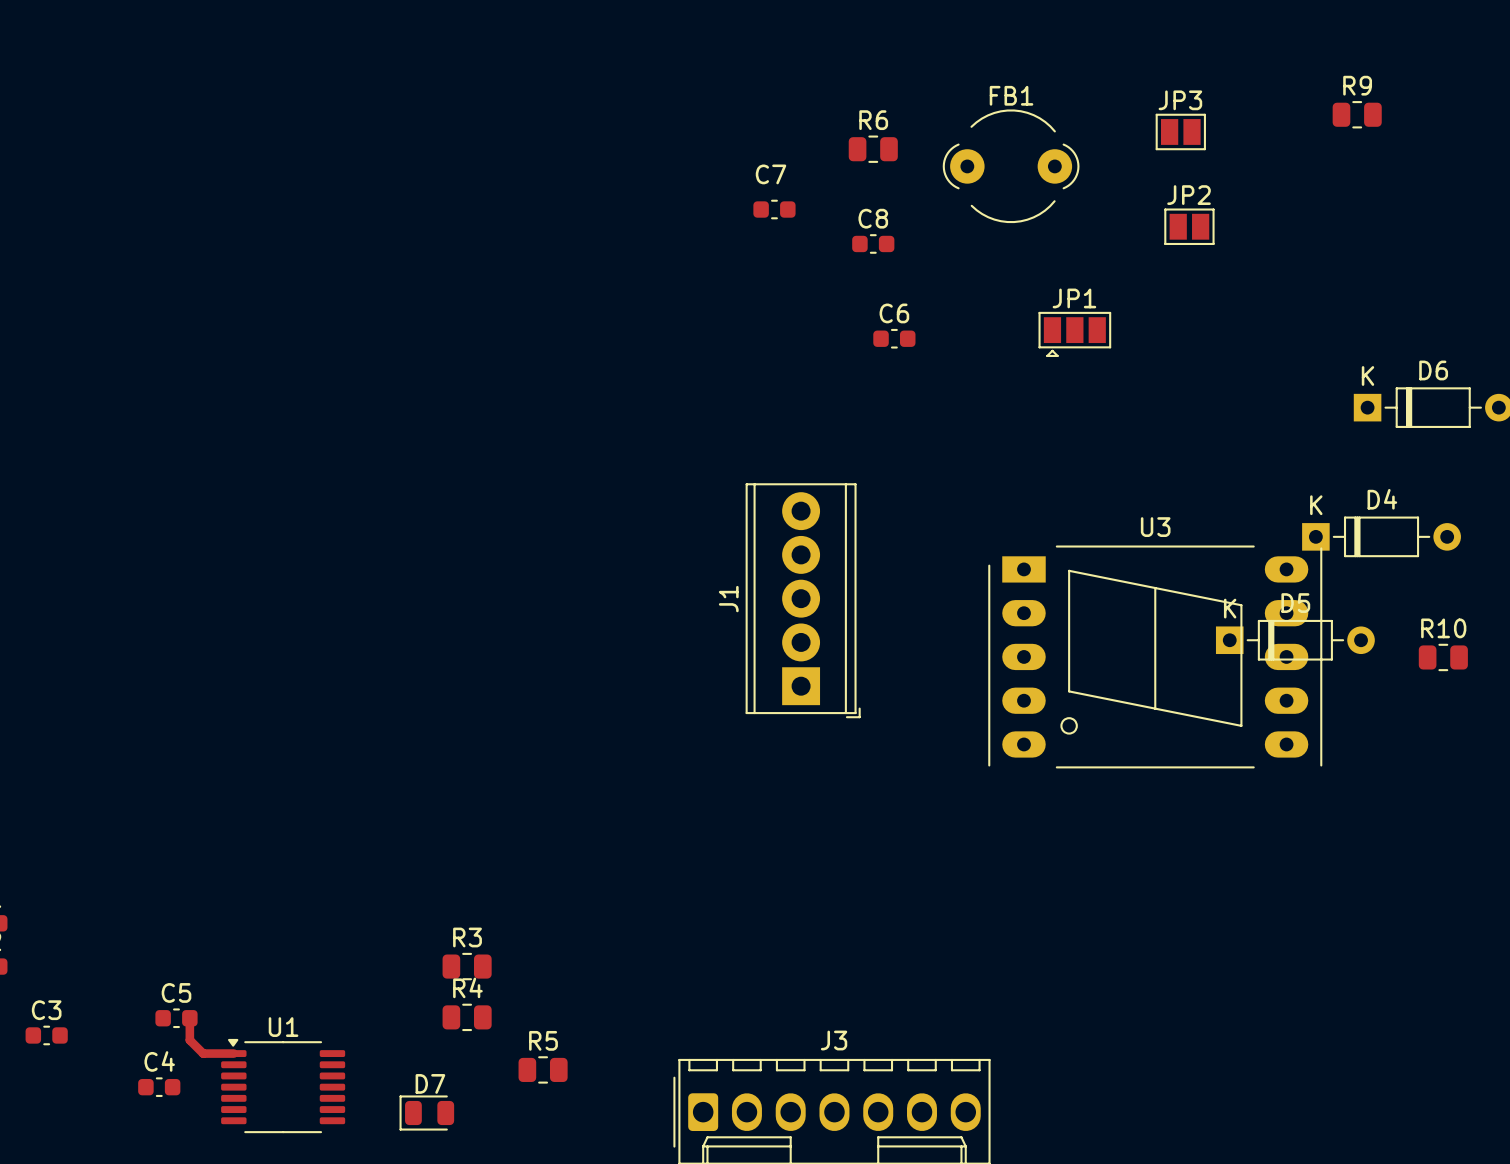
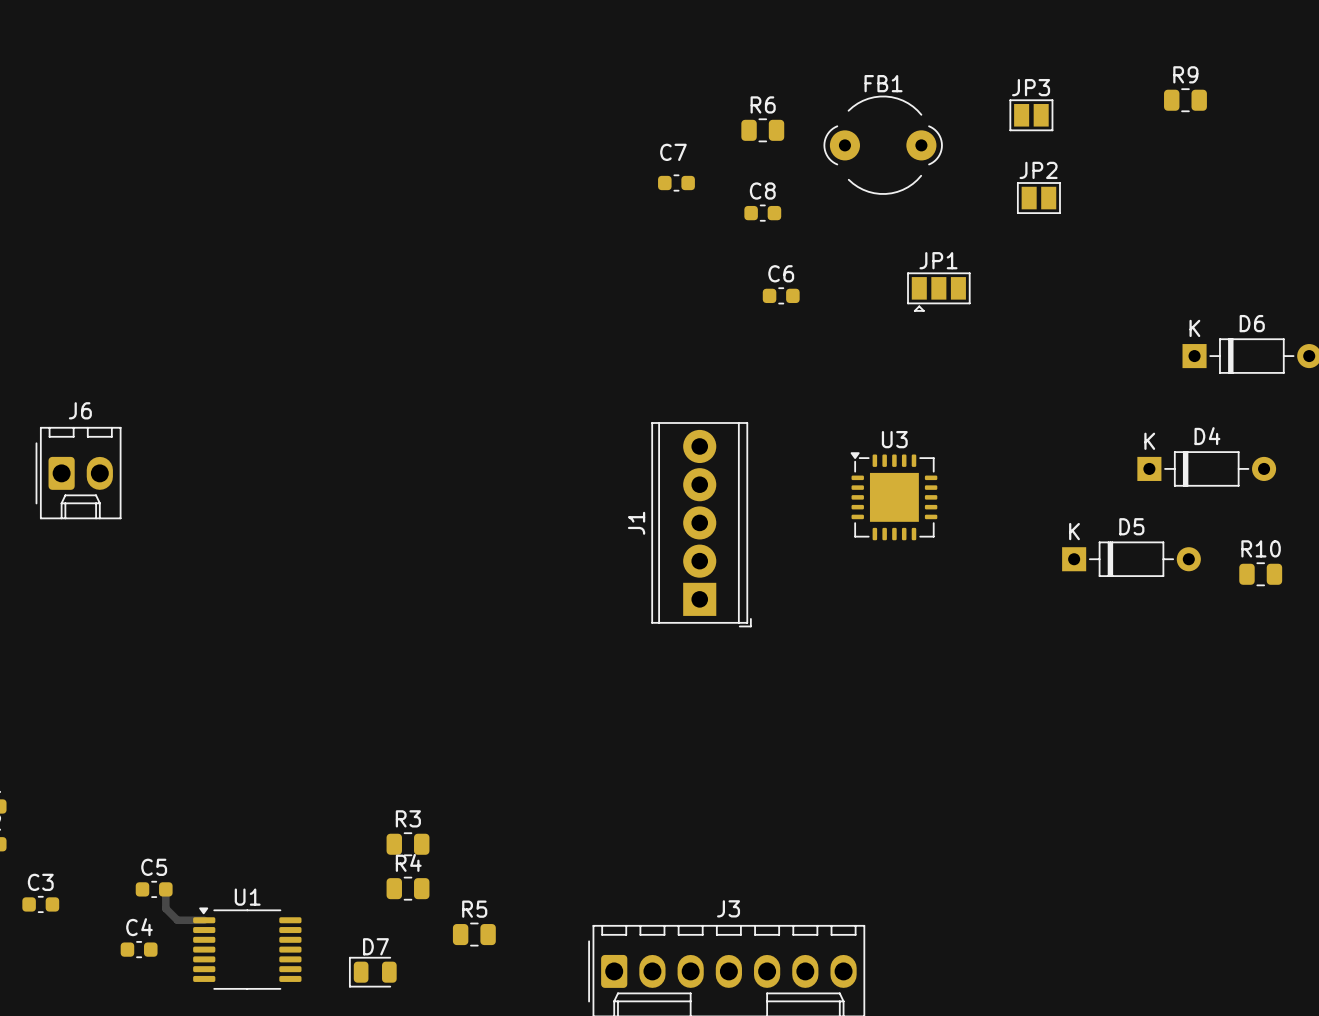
U3 name position: U3 (1155, 527) -> U3 (894, 439)
J6: none -> (78, 473)
U3 footprint: [988, 545, 1323, 769] -> [850, 452, 938, 541]

